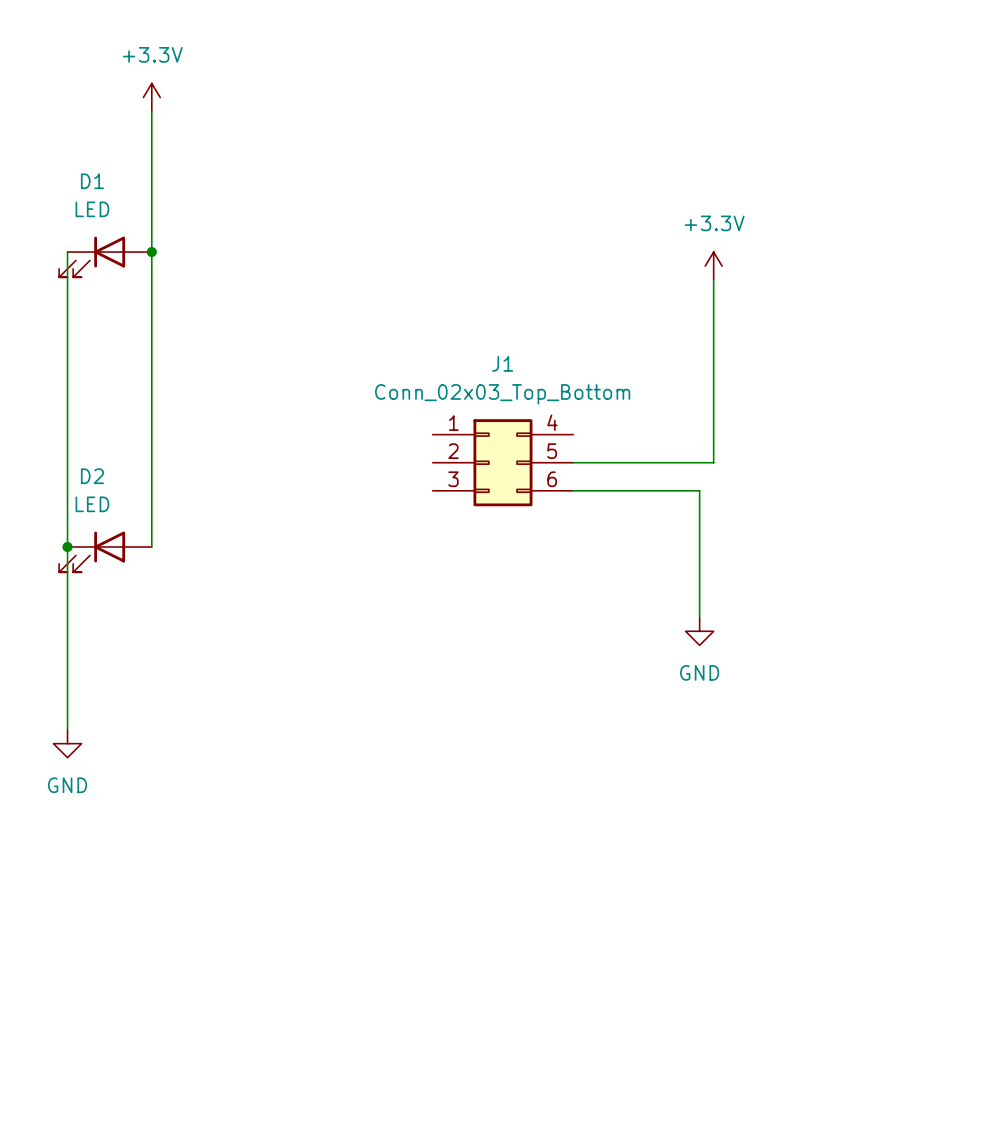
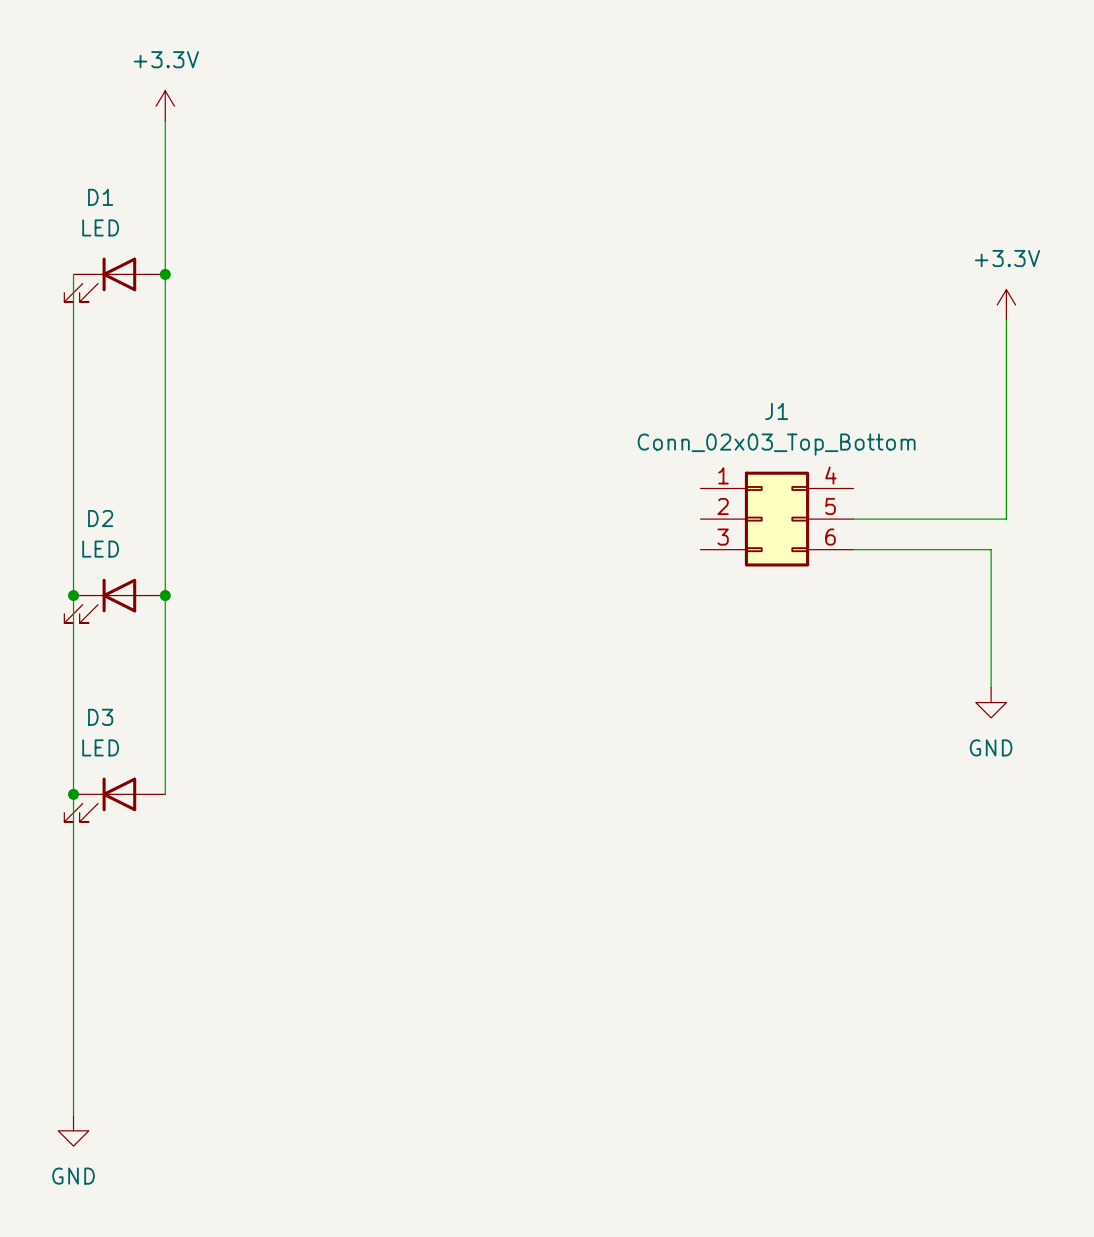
power symbol position: +3.3V (713, 266) -> +3.3V (1006, 304)
wire: (713, 280) (713, 462) (573, 462) -> (1006, 320) (1006, 519) (853, 519)
J1 position: (502, 462) -> (777, 519)
wire: (573, 490) (699, 490) (699, 617) -> (853, 549) (991, 549) (991, 687)
wire: none -> (165, 595) (165, 794)
junction: none -> (165, 595)
power symbol position: GND (699, 631) -> GND (991, 702)
wire: none -> (73, 794) (73, 1115)
junction: none -> (73, 794)
D3: none -> LED (114, 799)
power symbol: GND (67, 743) -> none
power symbol: none -> GND (73, 1130)

